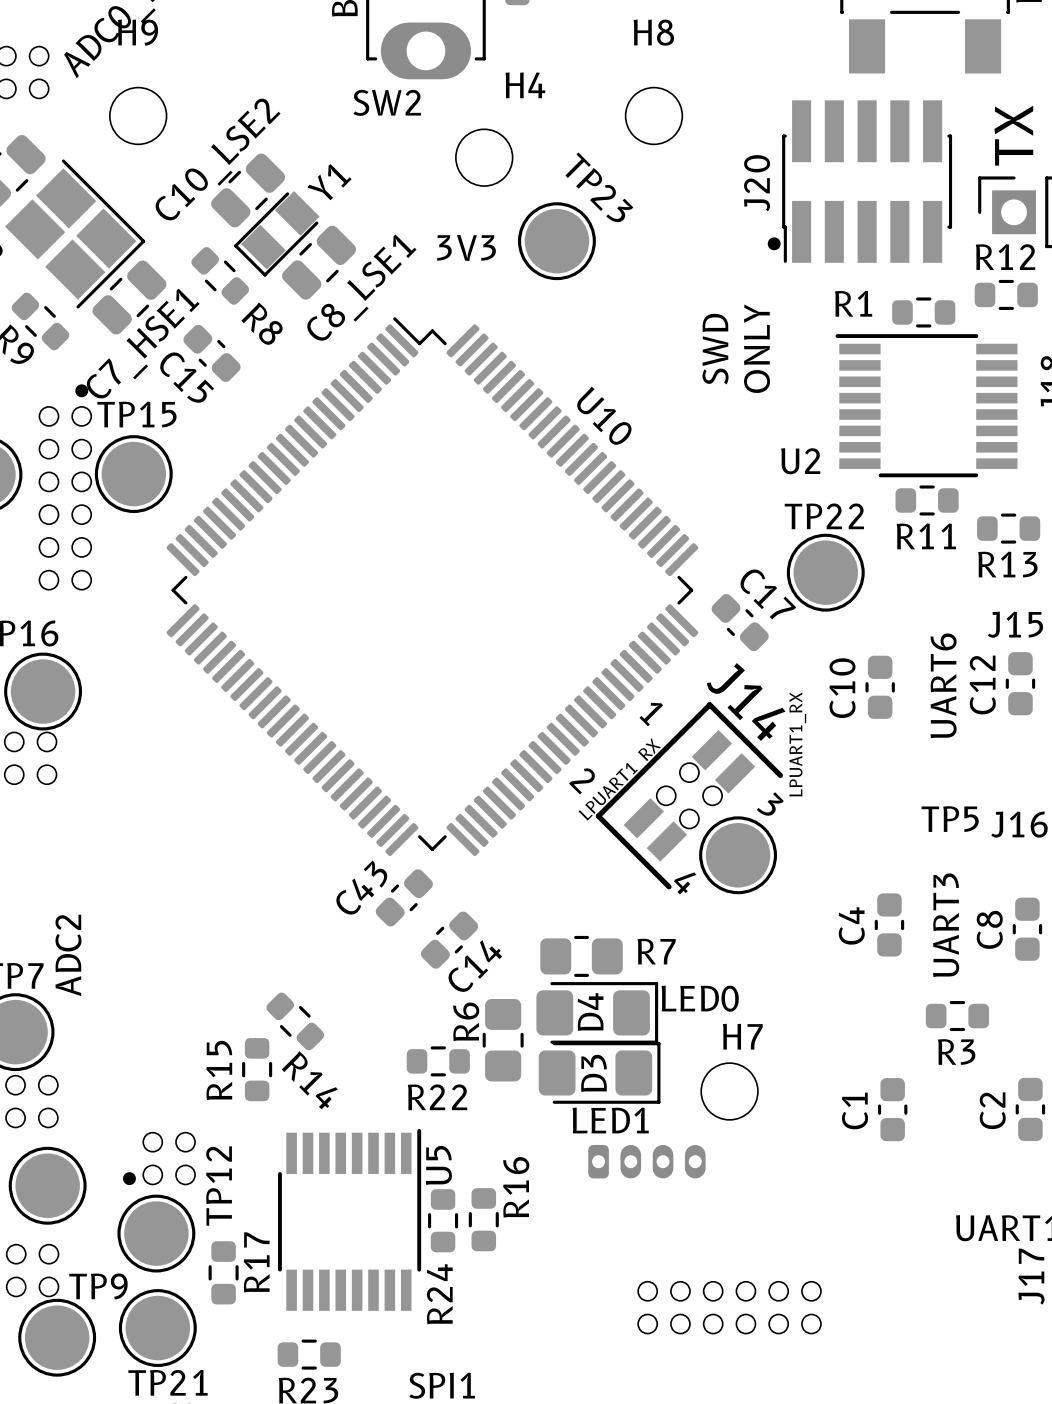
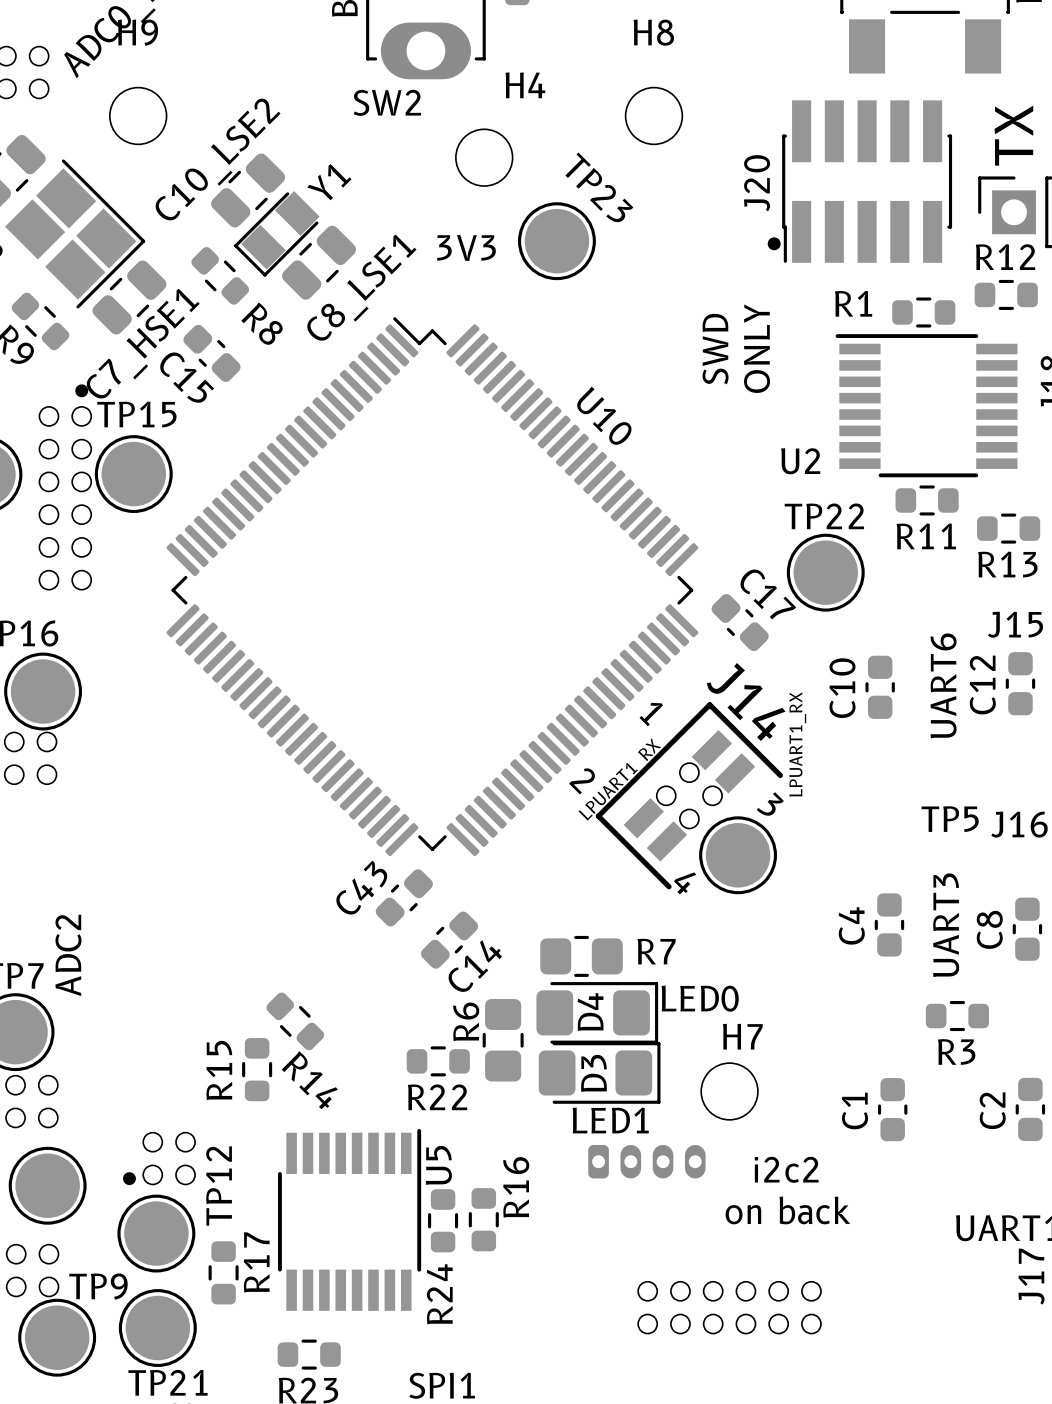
text: none -> i2c2 (786, 1169)
text: none -> on back (787, 1210)

